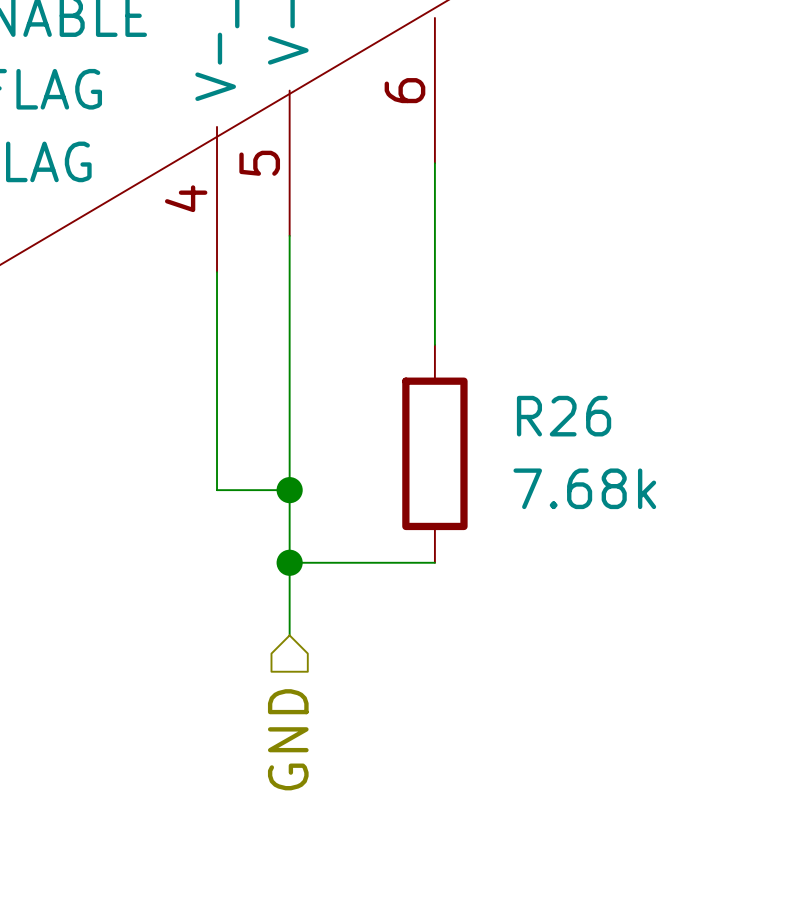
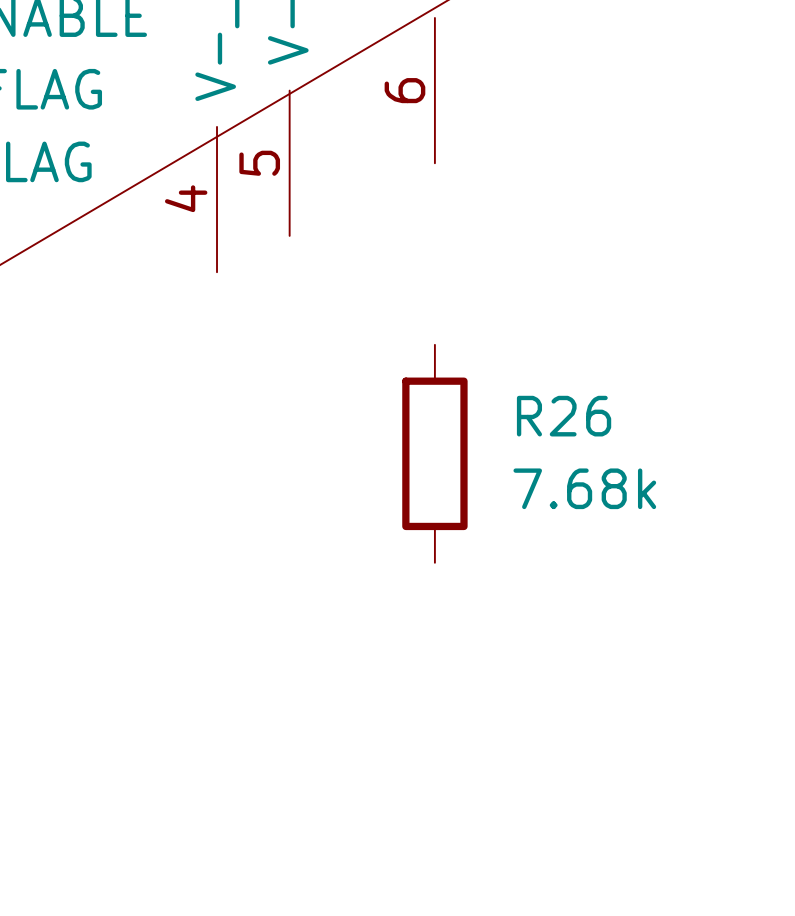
wire: (434, 163) (434, 344) -> none
wire: (289, 235) (289, 635) -> none
wire: (217, 272) (217, 490) (289, 490) -> none
junction: (289, 490) -> none
wire: (289, 562) (434, 562) -> none
junction: (289, 562) -> none
hierarchical label: GND (288, 739) -> none

